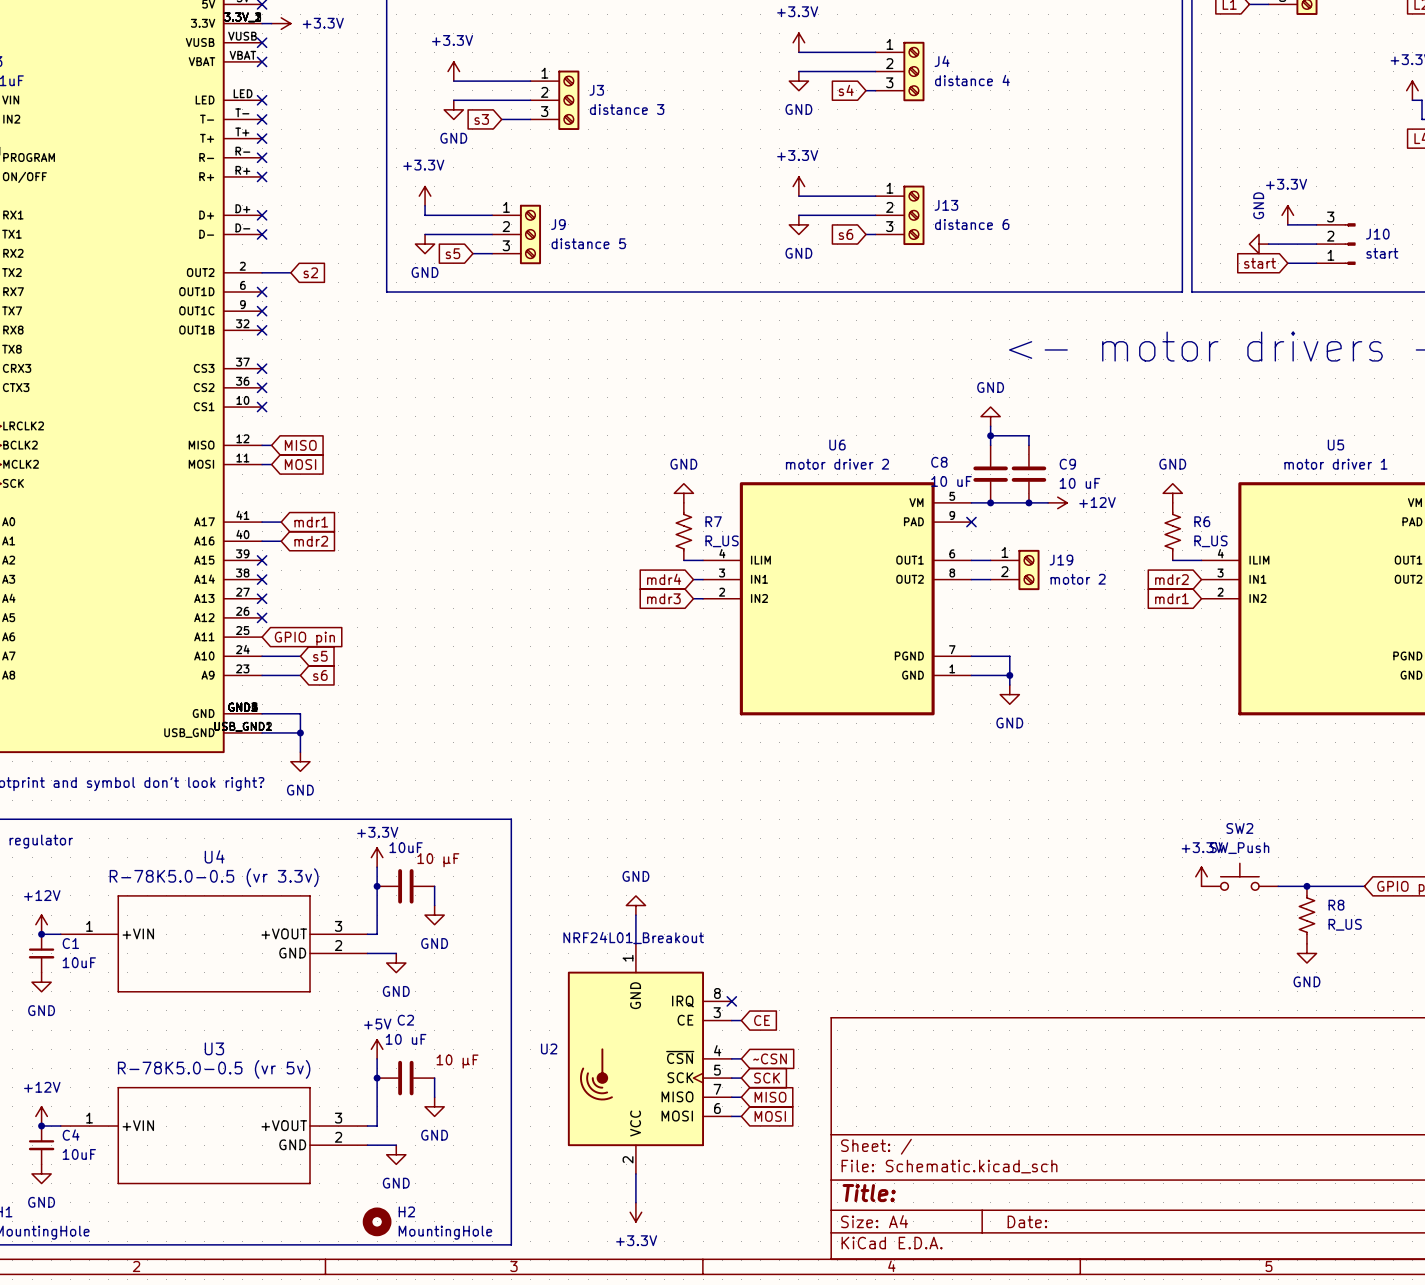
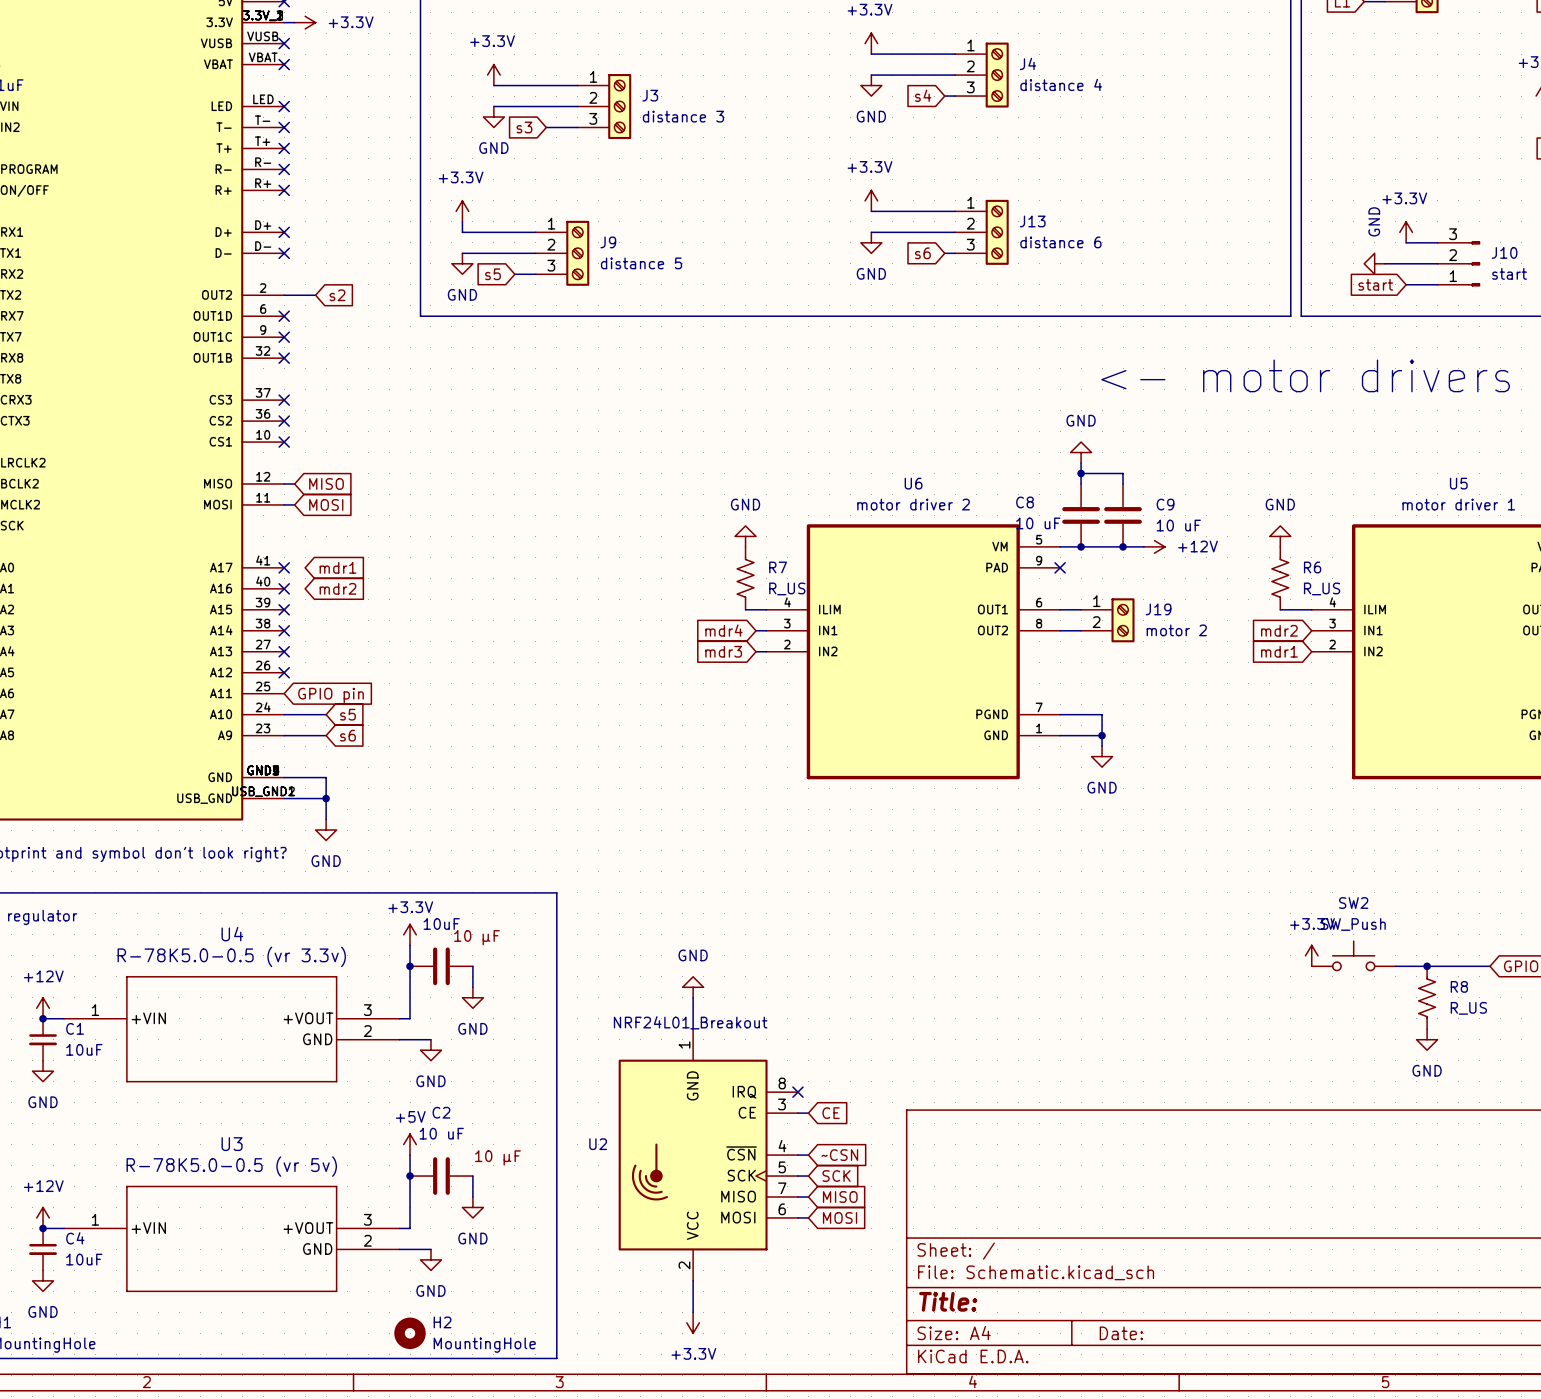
wire: (262, 522) (281, 522) -> none
no-connect mark: none -> (284, 567)
wire: (262, 541) (281, 541) -> none
no-connect mark: none -> (284, 588)

